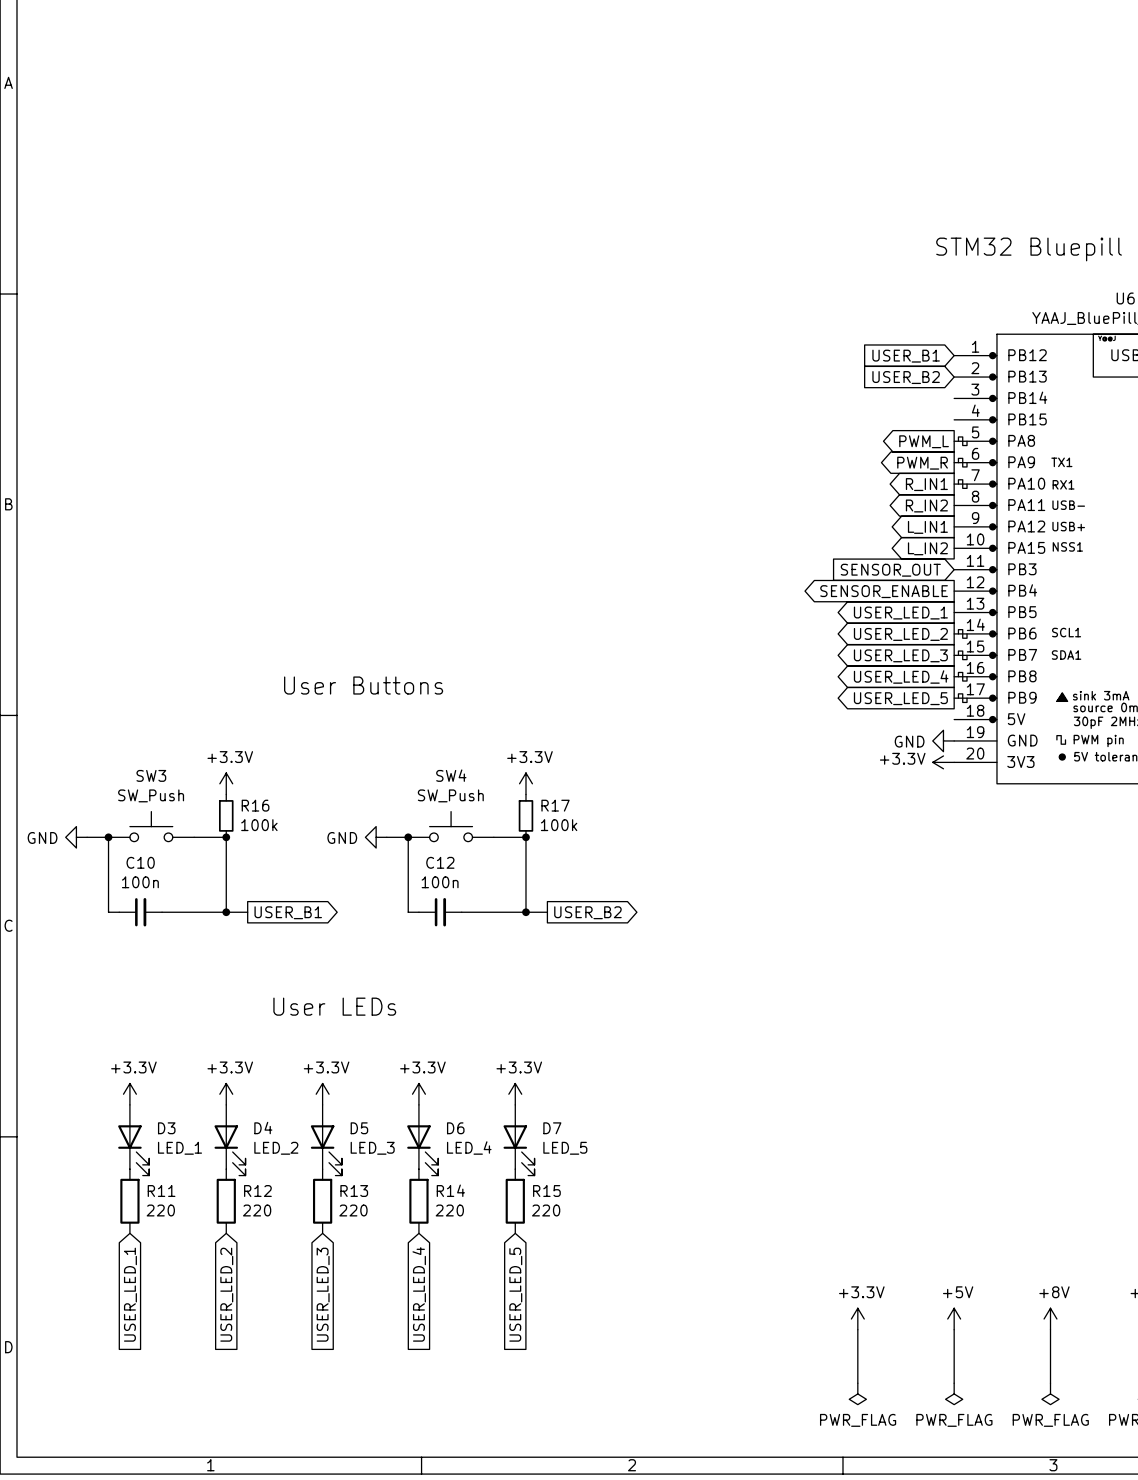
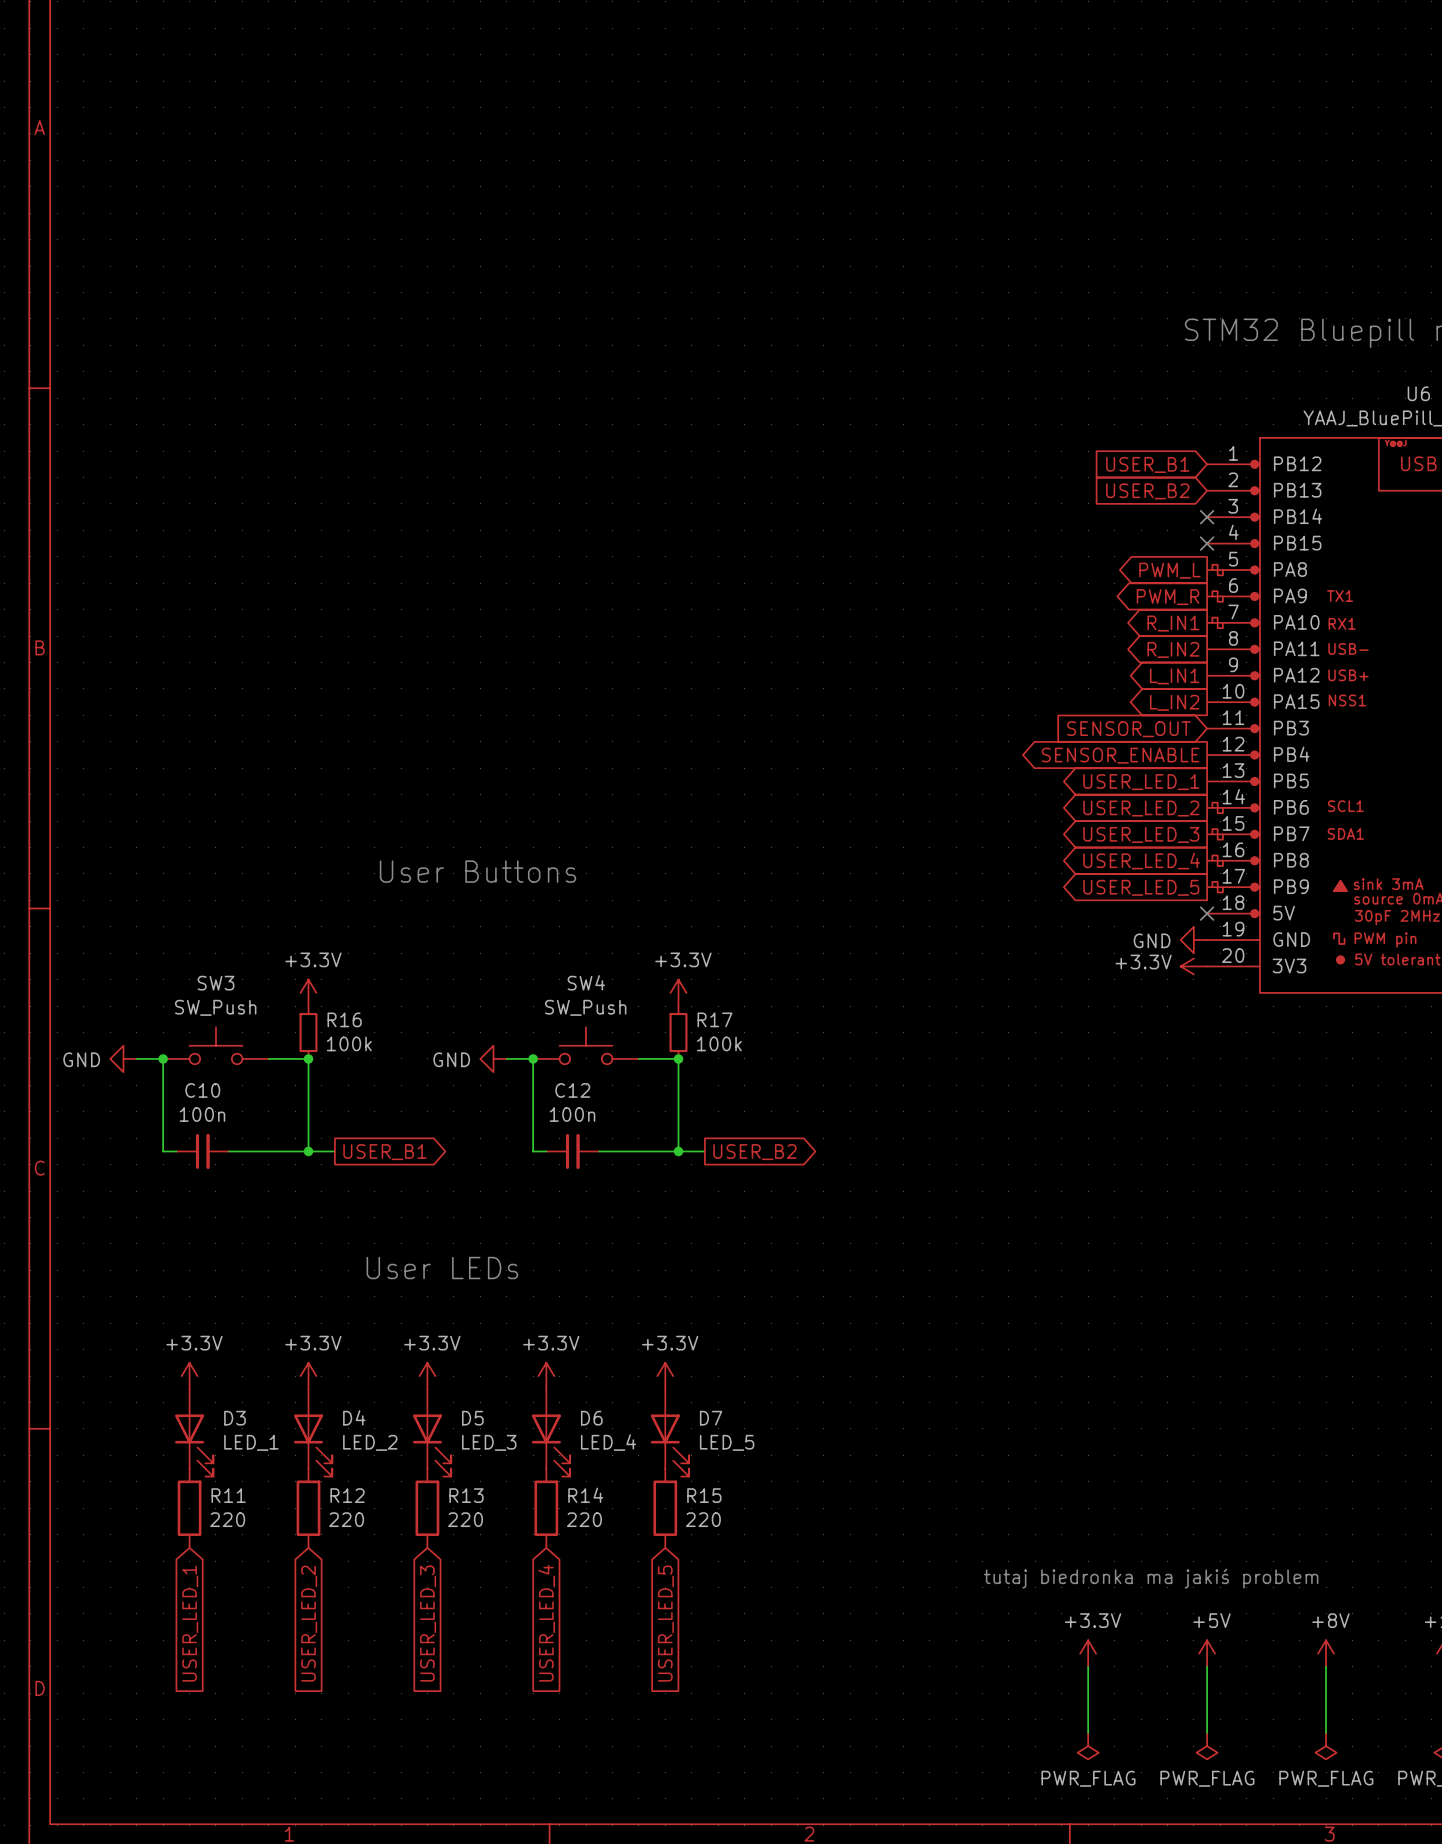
no-connect mark: none -> (1207, 517)
no-connect mark: none -> (1207, 543)
no-connect mark: none -> (1207, 913)
text: none -> tutaj biedronka ma jakiś problem (1151, 1578)

